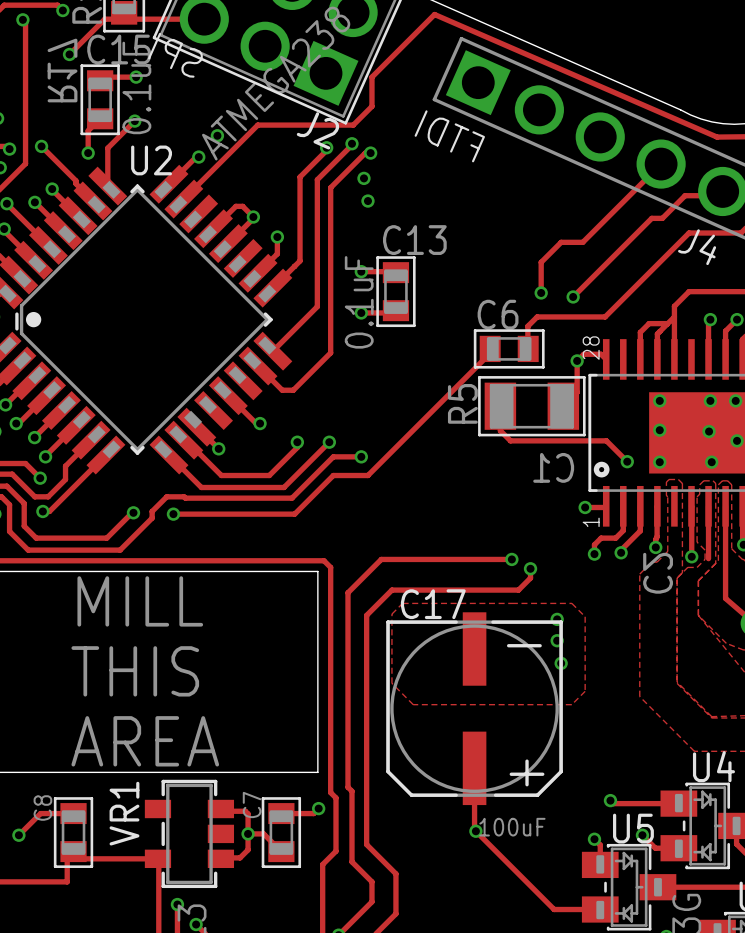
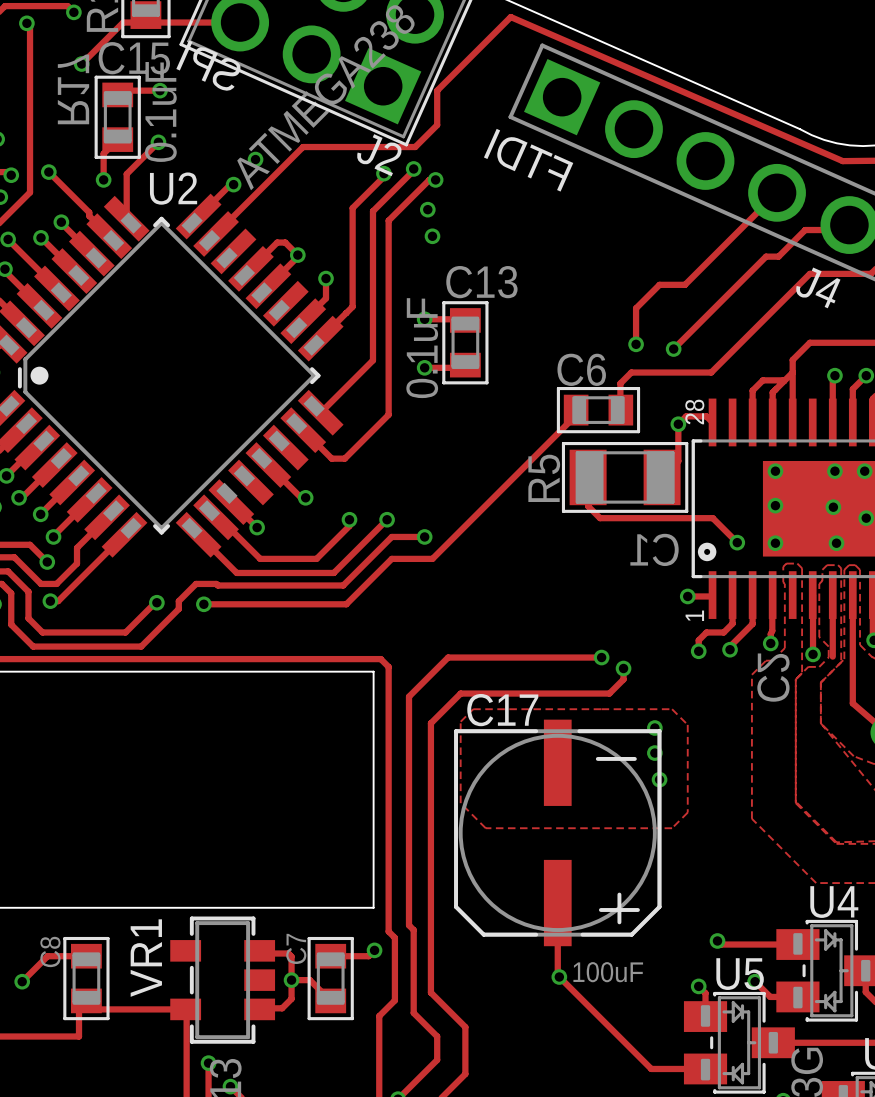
text: MILL (140, 601) -> none
text: THIS (135, 671) -> none
text: AREA (145, 741) -> none

